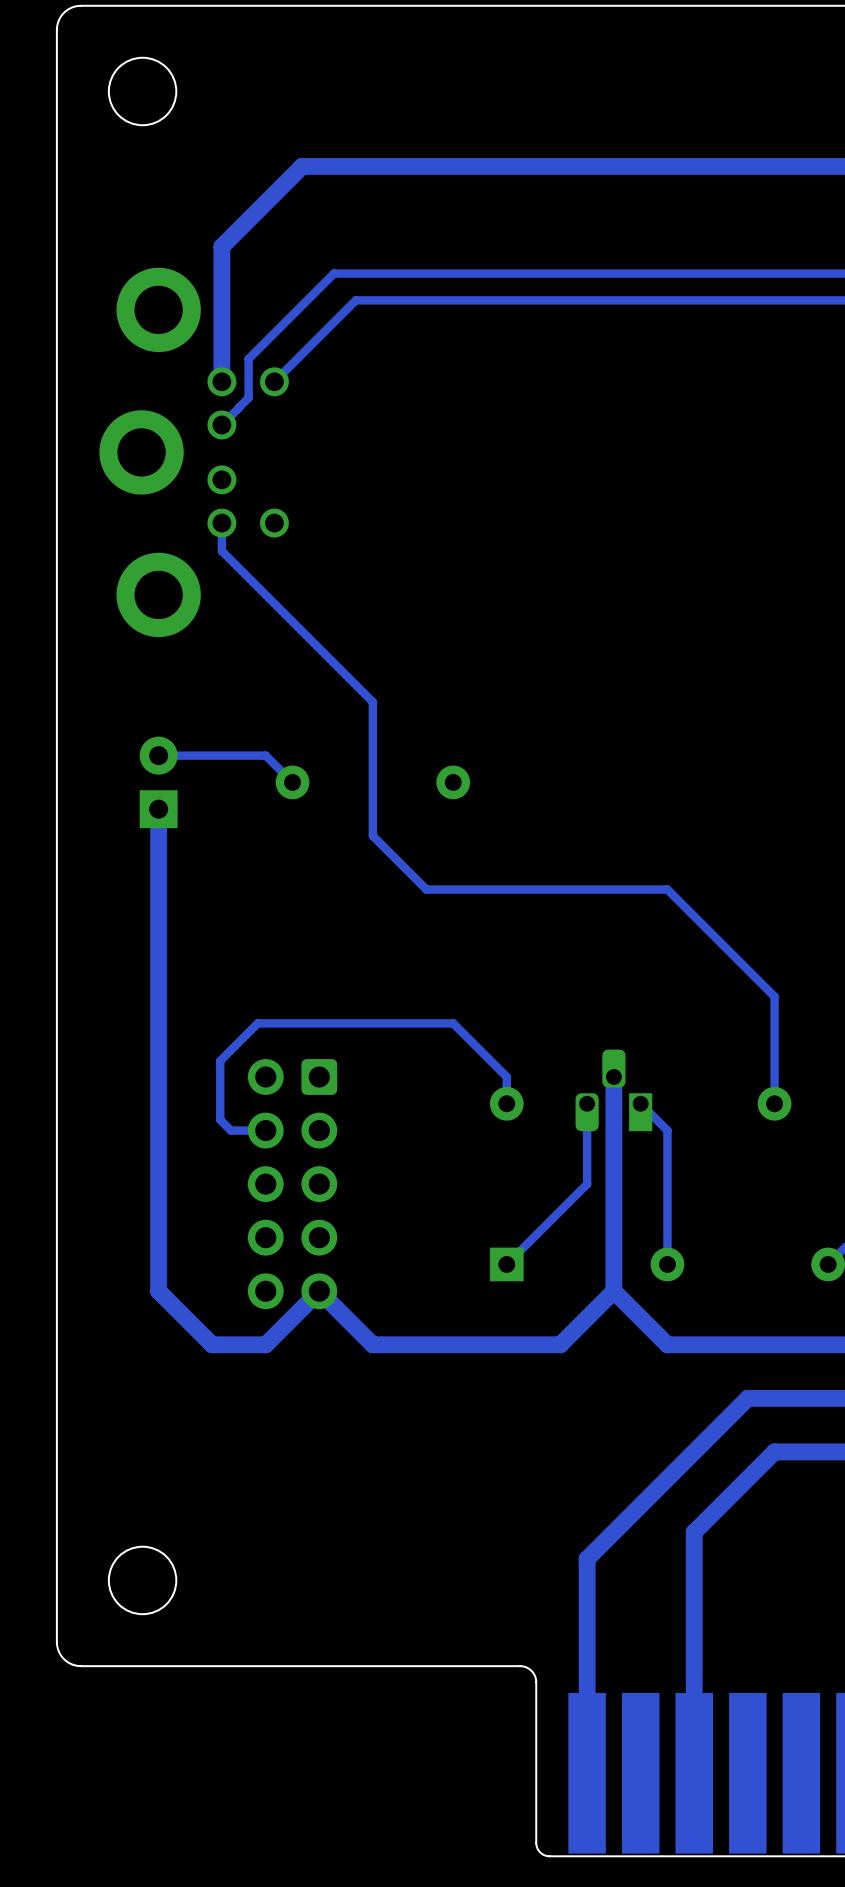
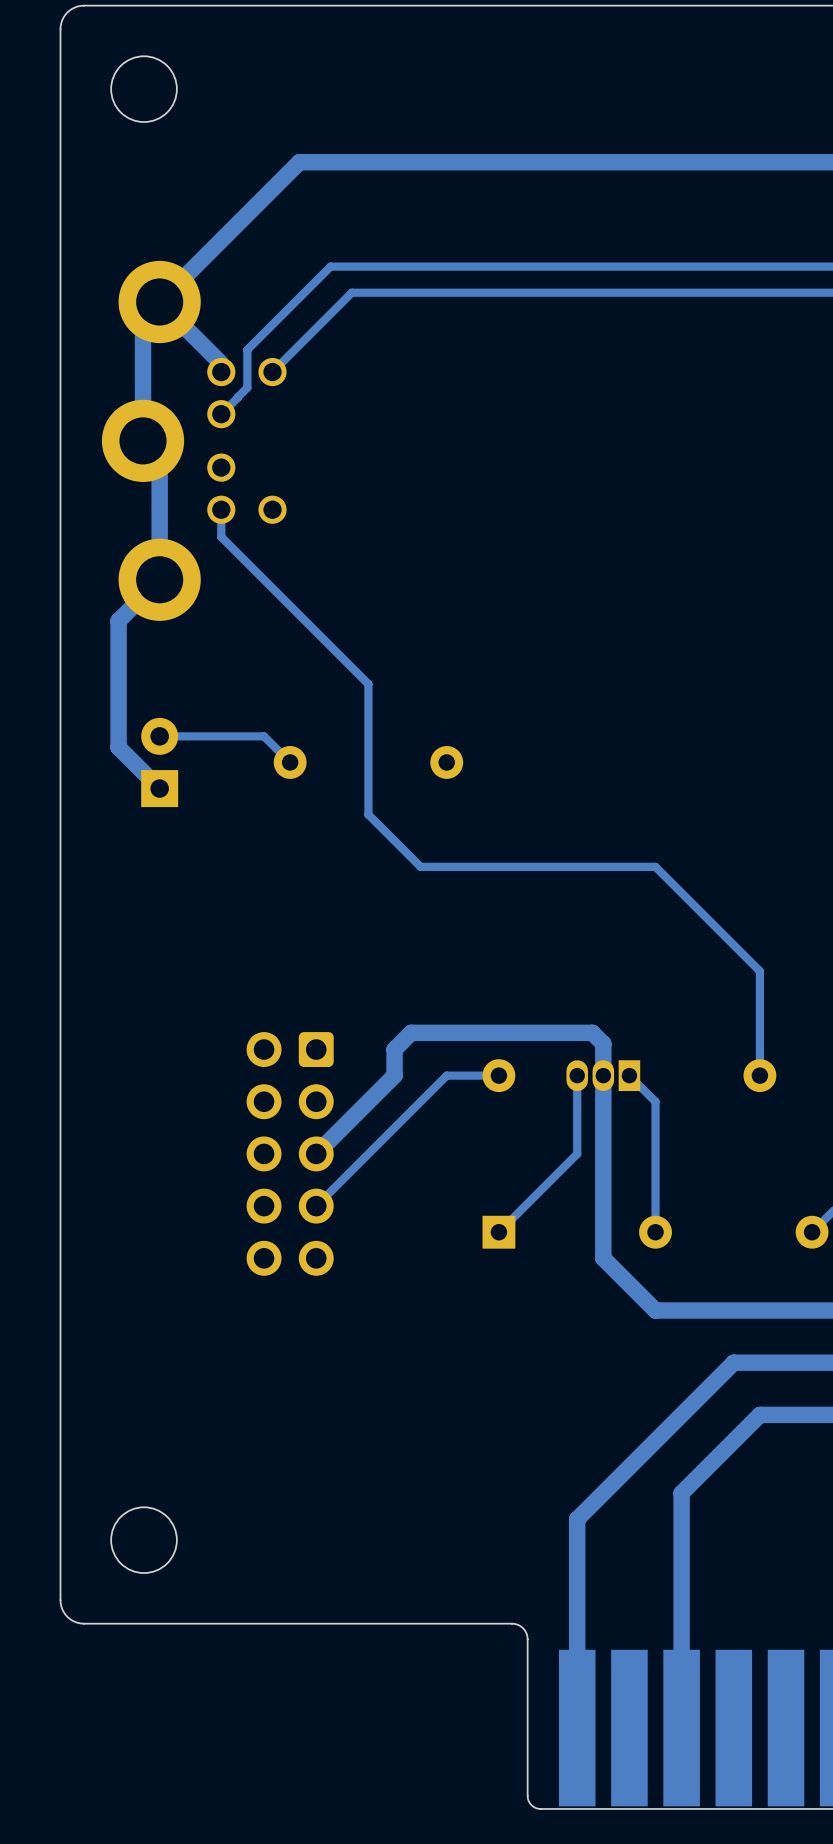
track: (221, 246) (221, 381) -> (221, 240) (159, 302) (221, 363)
track: none -> (143, 318) (143, 440)
track: (158, 809) (158, 1291) (212, 1344) (265, 1344) (319, 1291) (372, 1344) (560, 1344) (613, 1291) -> (159, 788) (118, 747) (118, 620) (159, 579) (159, 457)
part footprint: [575, 1049, 653, 1132] -> [566, 1060, 641, 1092]
track: none -> (603, 1049) (603, 1043) (592, 1032) (411, 1032) (394, 1049) (394, 1075) (316, 1153)
track: (506, 1103) (506, 1076) (453, 1023) (257, 1023) (220, 1060) (220, 1119) (230, 1130) (265, 1130) -> (498, 1075) (446, 1075) (316, 1206)

